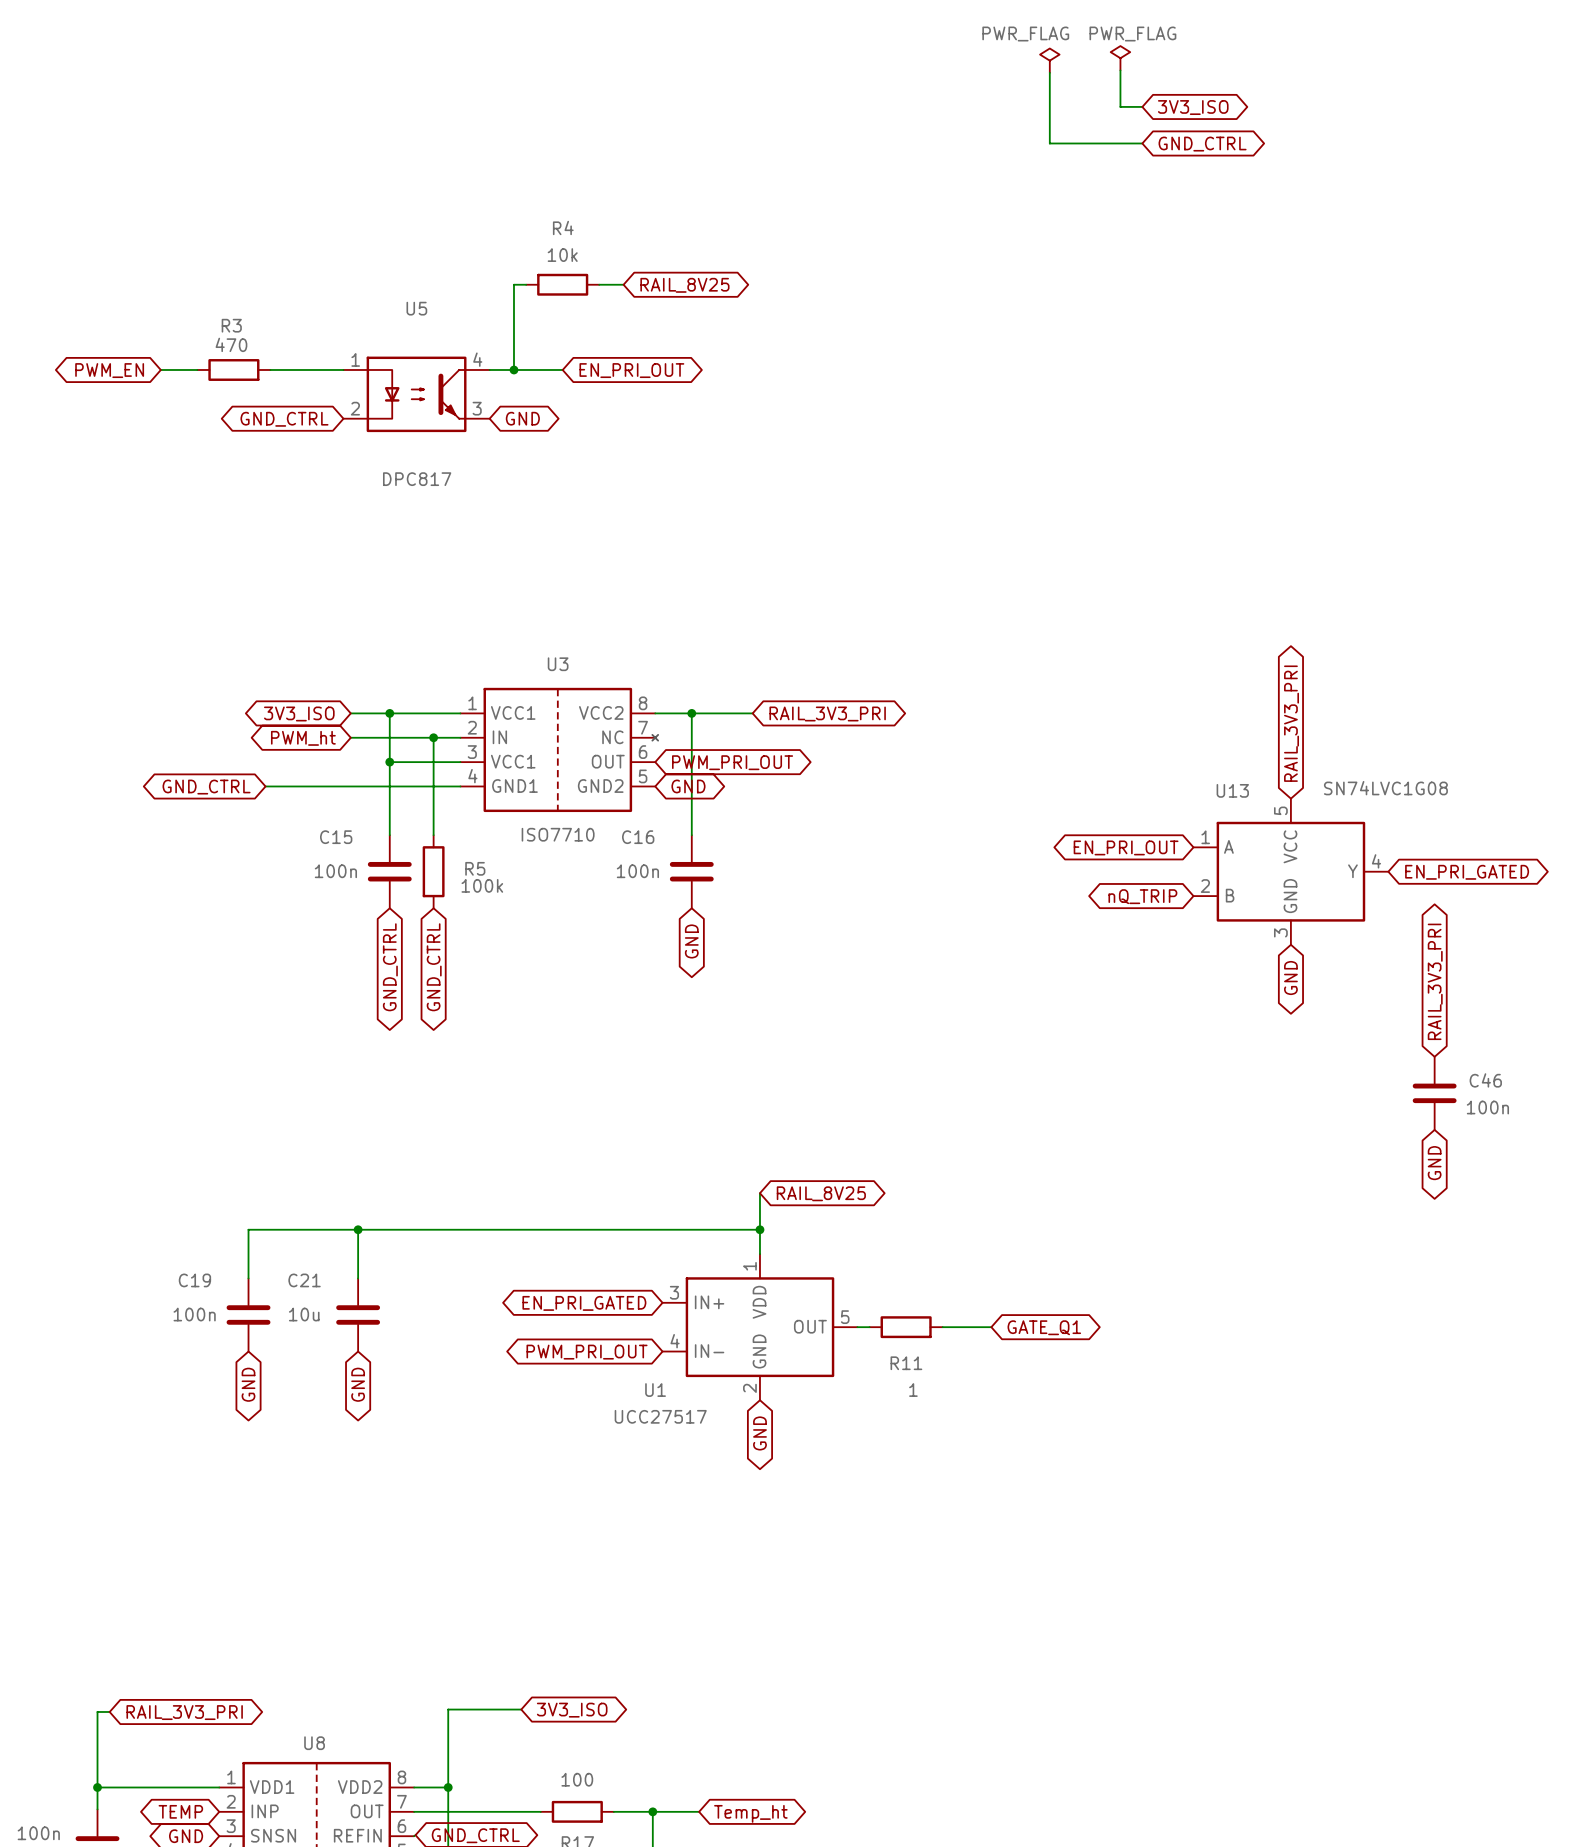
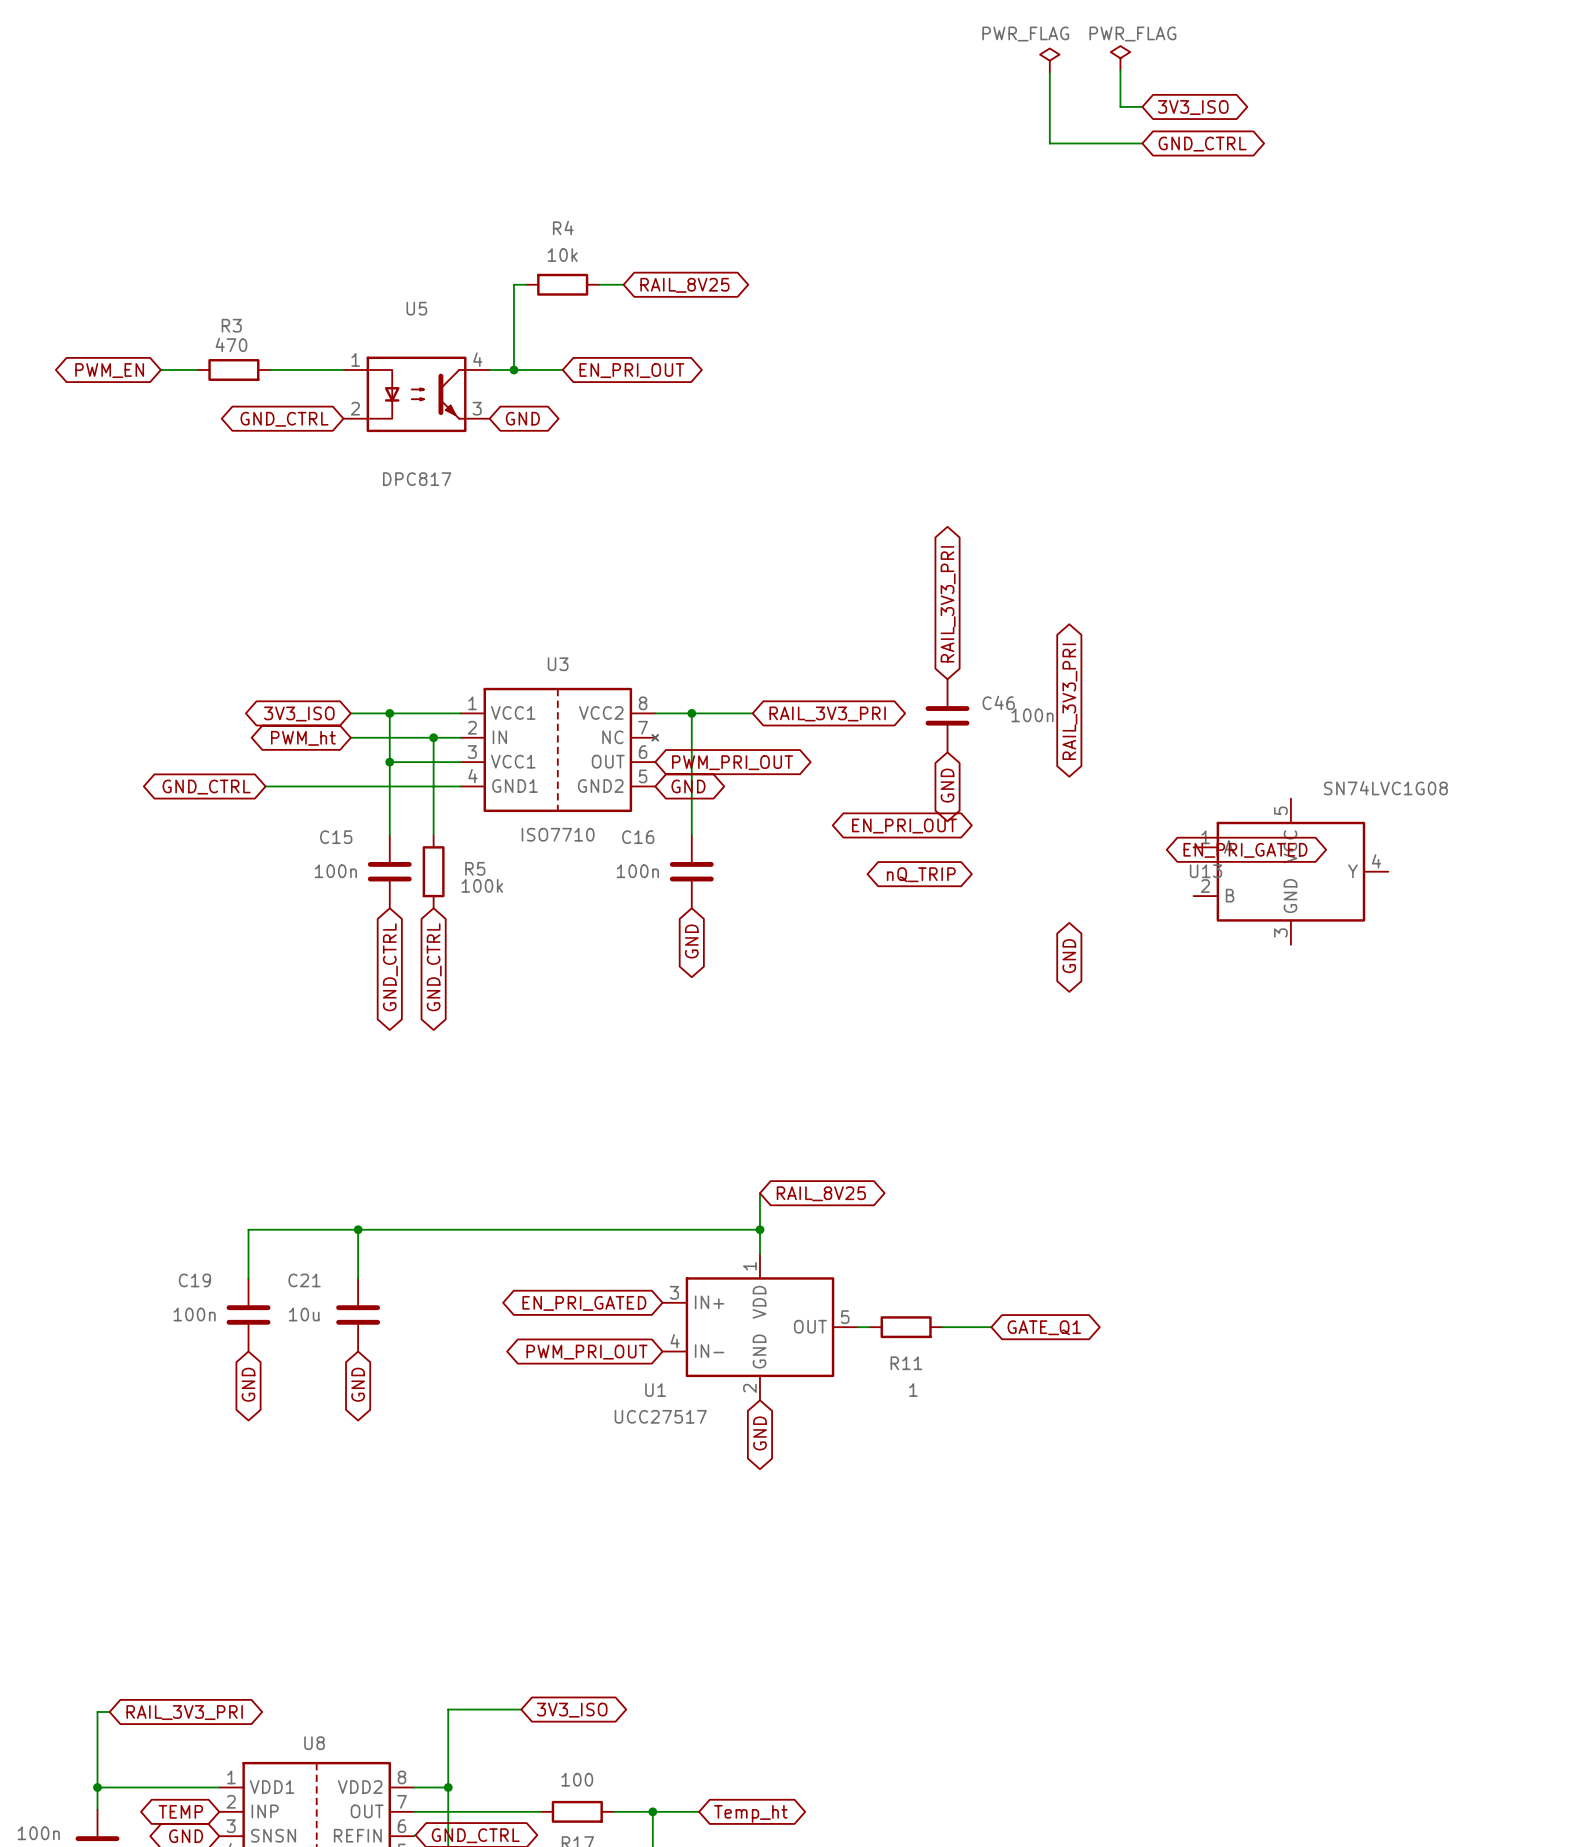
global label: none -> RAIL_3V3_PRI (948, 604)
global label: none -> RAIL_3V3_PRI (1069, 701)
global label: RAIL_3V3_PRI (1291, 723) -> none
global label: none -> GND (947, 785)
U13 name position: U13 (1232, 790) -> U13 (1205, 871)
global label position: EN_PRI_OUT (1126, 847) -> EN_PRI_OUT (904, 826)
global label position: EN_PRI_GATED (1467, 872) -> EN_PRI_GATED (1245, 850)
global label position: nQ_TRIP (1142, 896) -> nQ_TRIP (921, 874)
global label: none -> GND (1069, 956)
global label: GND (1290, 978) -> none
global label: RAIL_3V3_PRI (1435, 981) -> none
C46 position: (1434, 1093) -> (947, 715)
C46 value position: 100n (1487, 1107) -> 100n (1032, 715)
global label: GND (1434, 1163) -> none

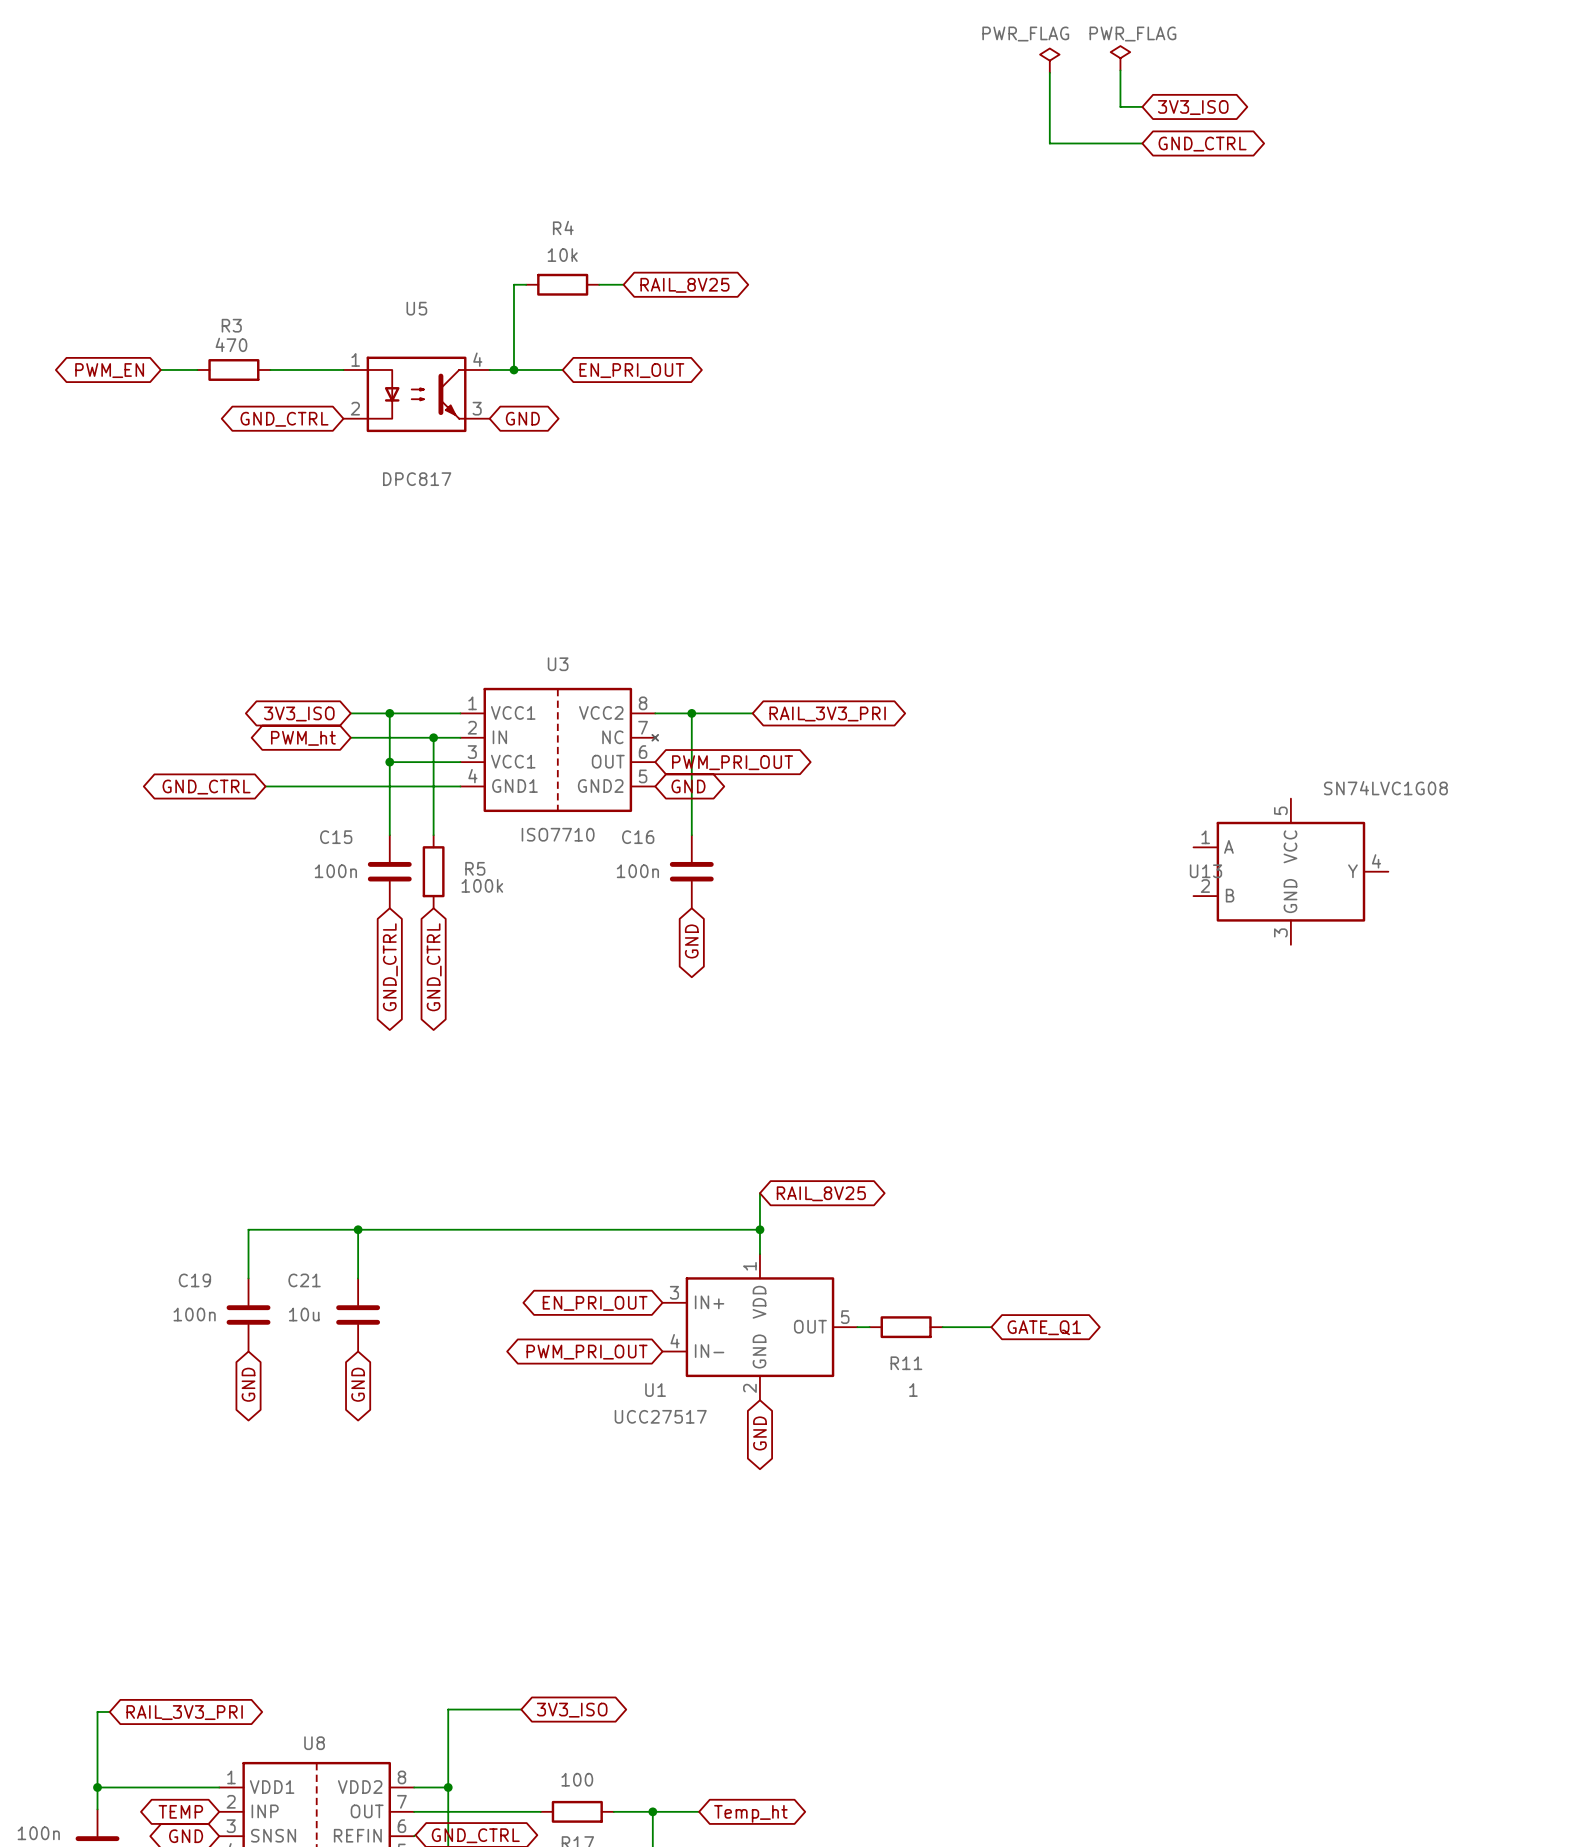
global label: RAIL_3V3_PRI (948, 604) -> none
global label: RAIL_3V3_PRI (1069, 701) -> none
C46: 100n (947, 715) -> none
global label: GND (947, 785) -> none
global label: EN_PRI_OUT (904, 826) -> none
global label: EN_PRI_GATED (1245, 850) -> none
global label: nQ_TRIP (921, 874) -> none
global label: GND (1069, 956) -> none
global label: EN_PRI_GATED (584, 1303) -> EN_PRI_OUT (595, 1303)

